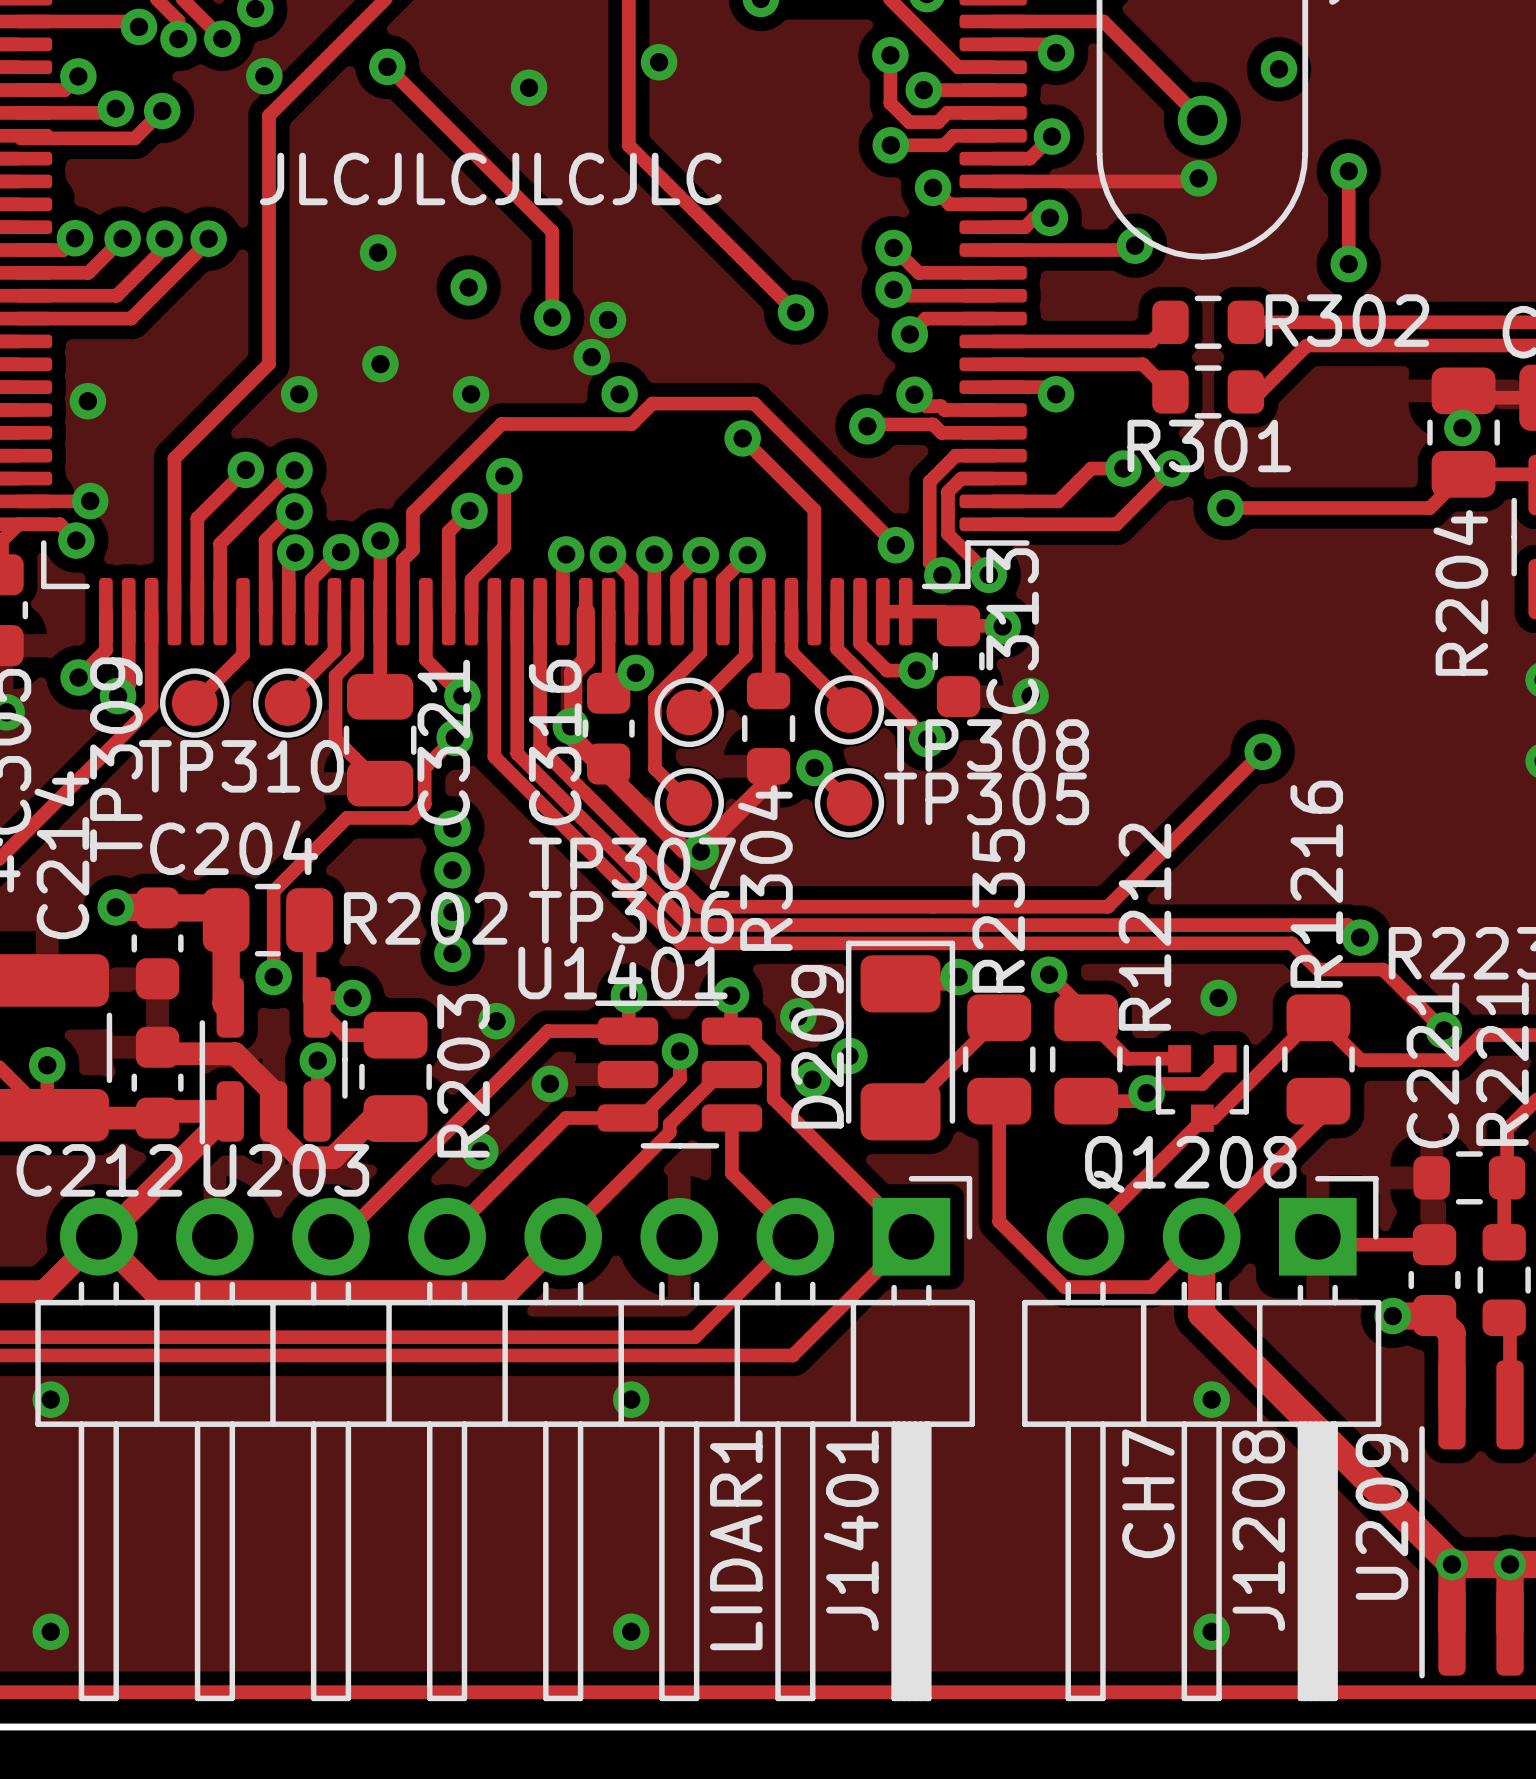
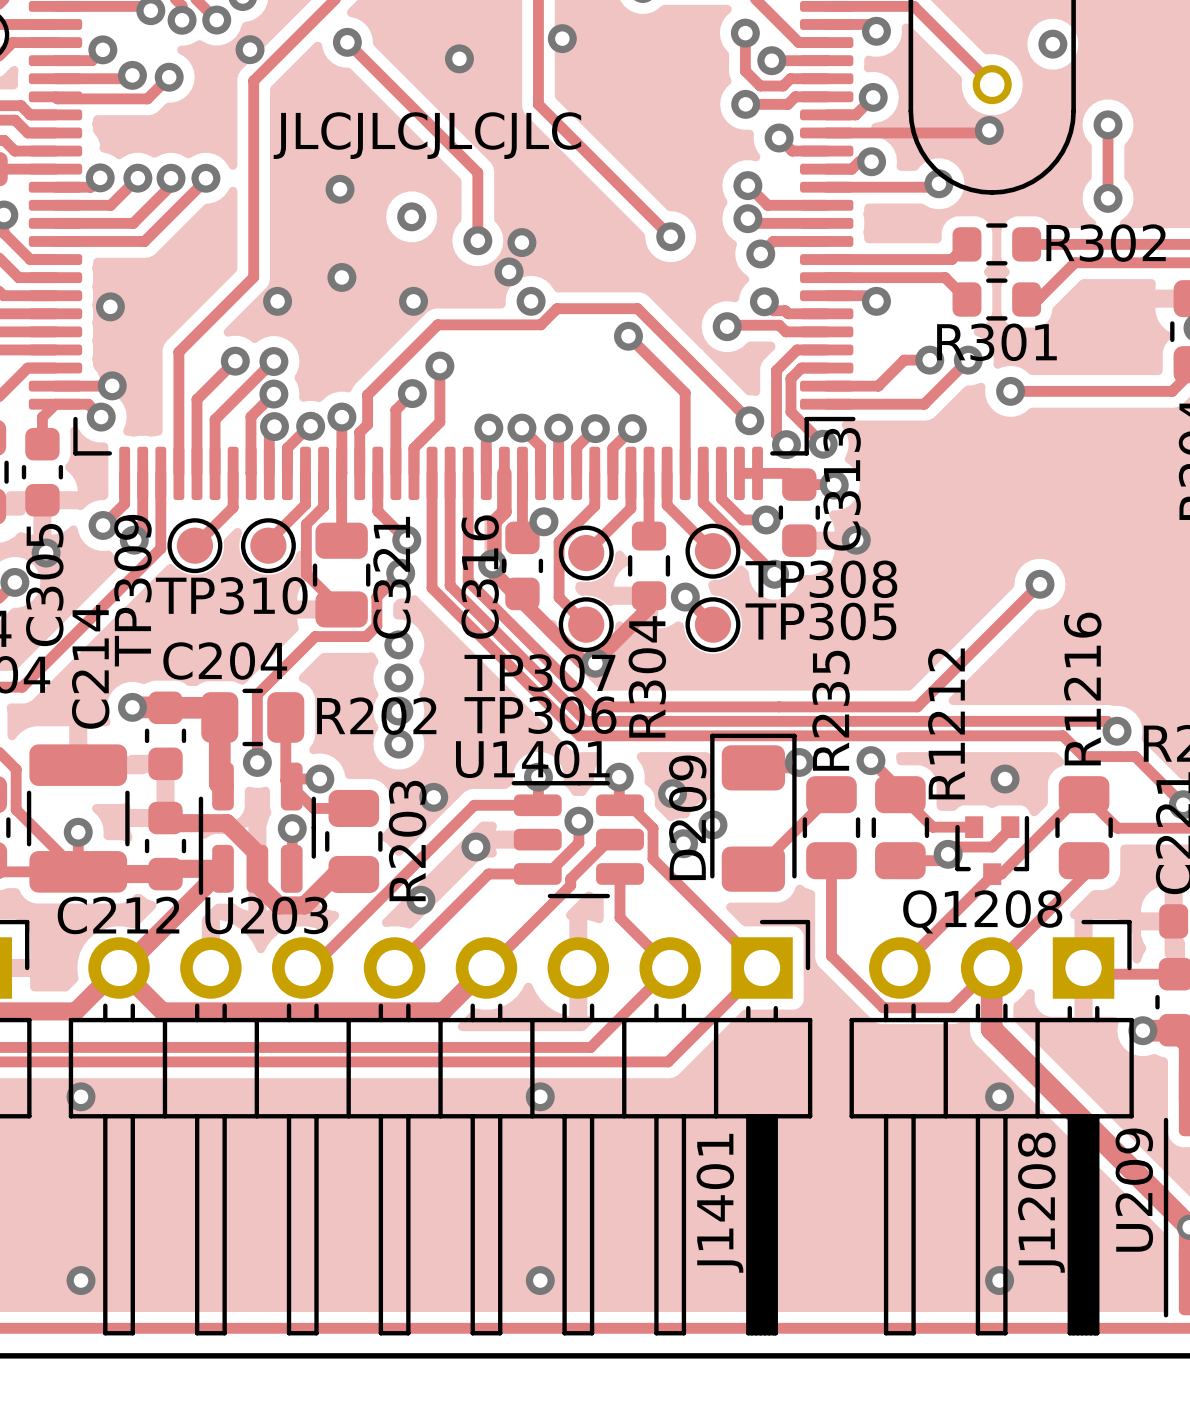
J1208 value: CH7 (1148, 1493) -> none
J1401 value: LIDAR1 (736, 1540) -> none

